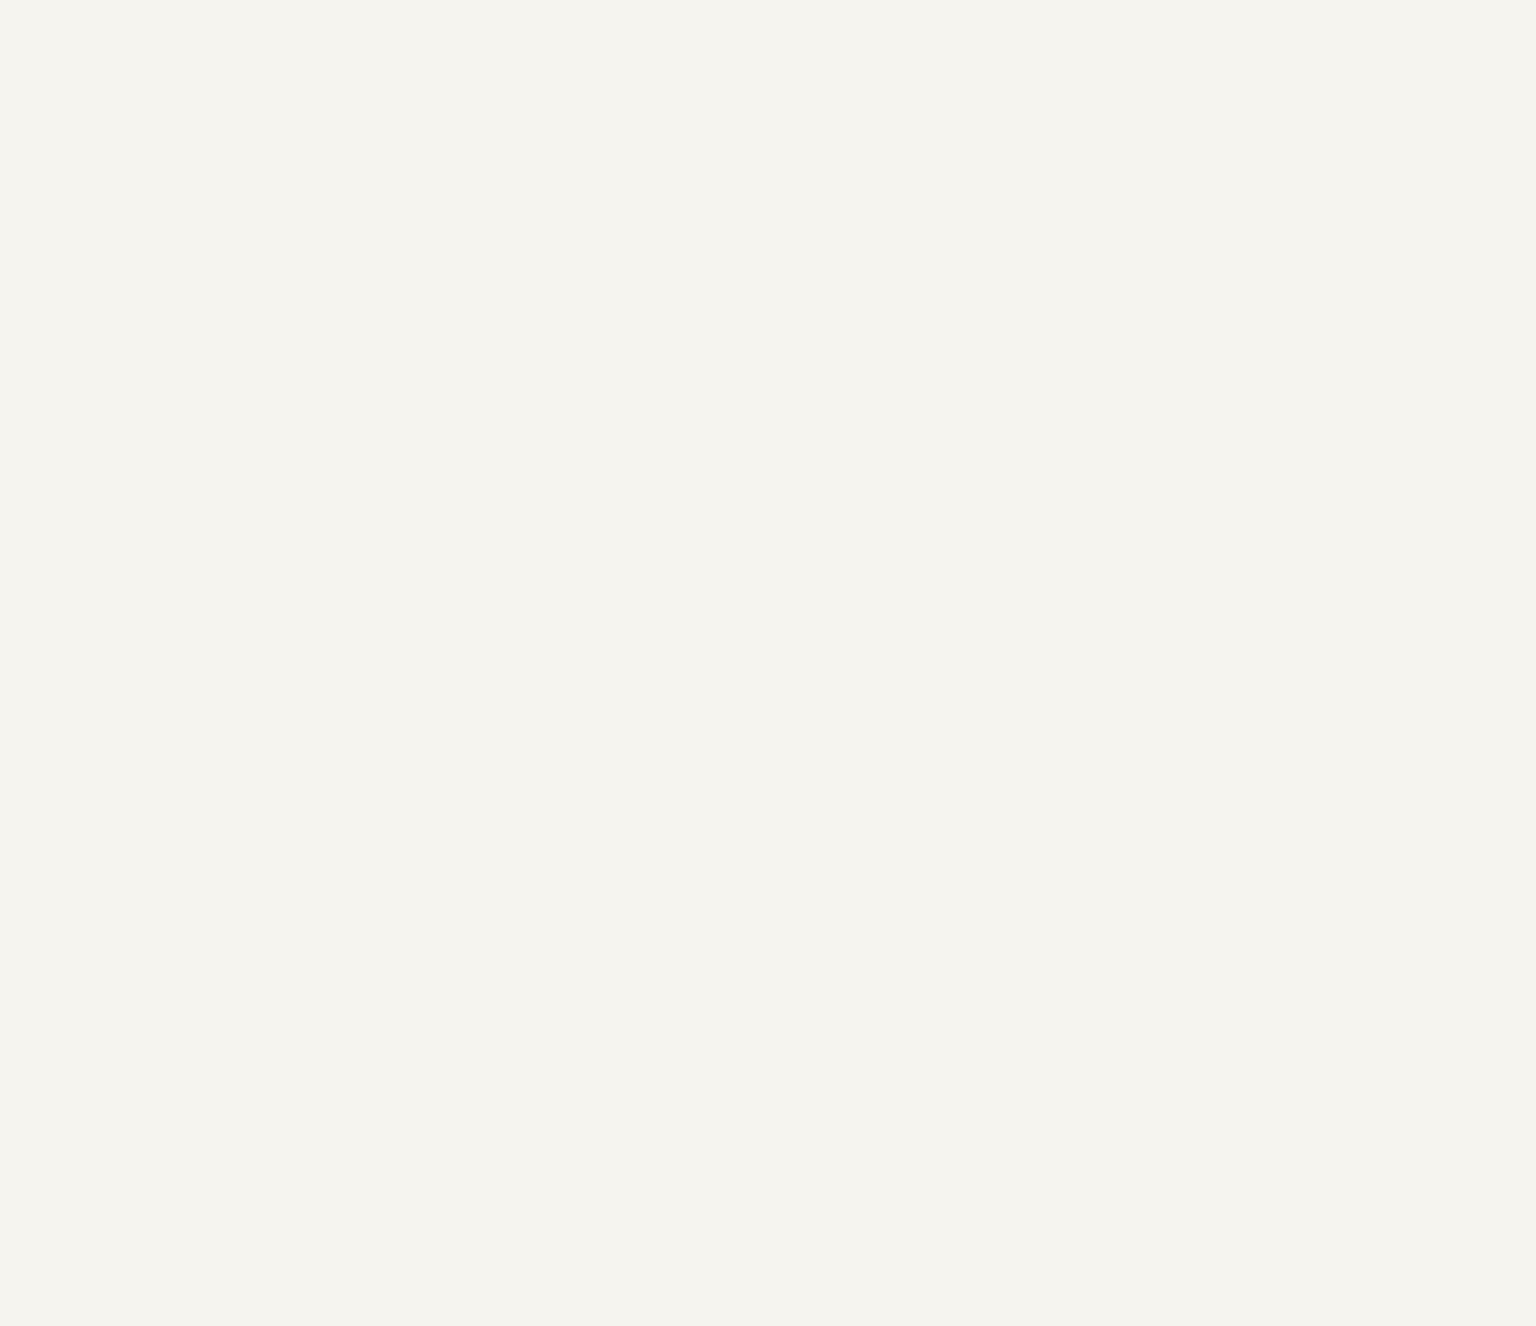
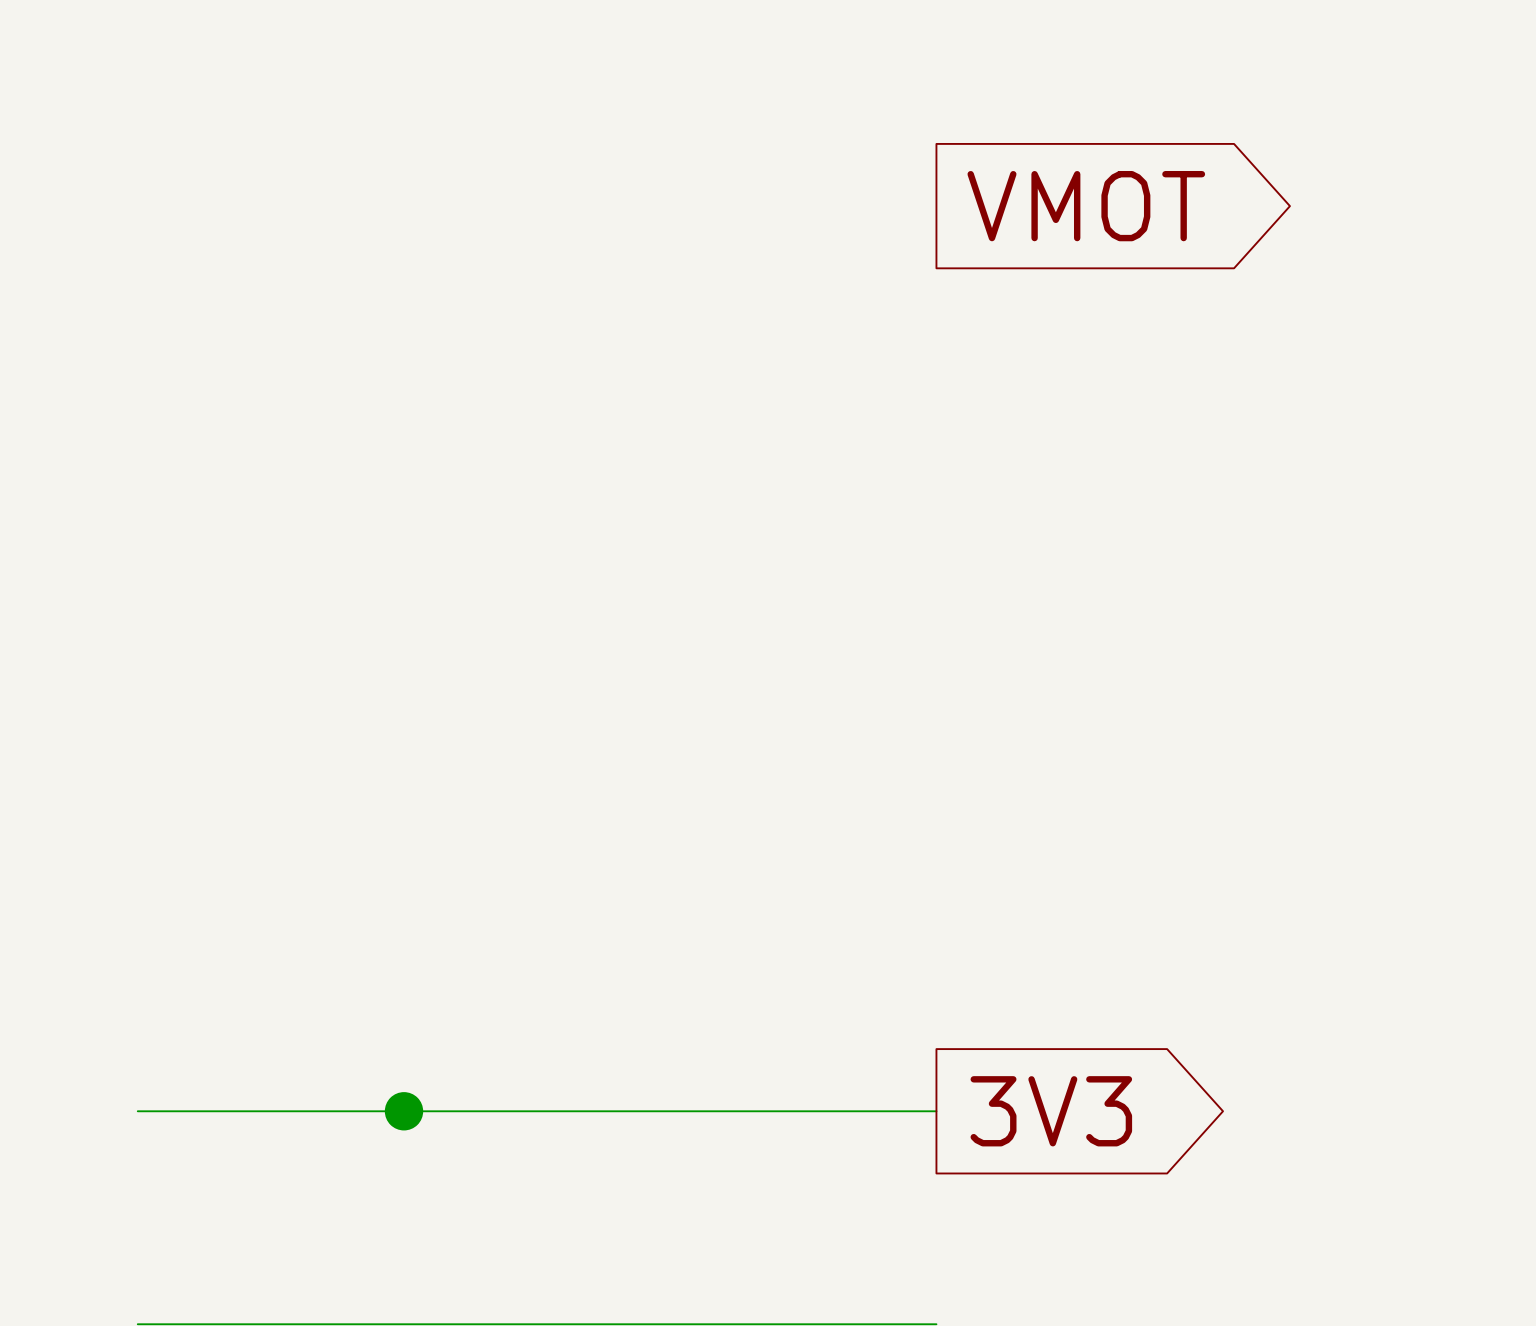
global label: none -> VMOT (1086, 206)
wire: none -> (137, 1111) (936, 1111)
junction: none -> (404, 1111)
global label: none -> 3V3 (1051, 1111)
wire: none -> (137, 1324) (936, 1324)

